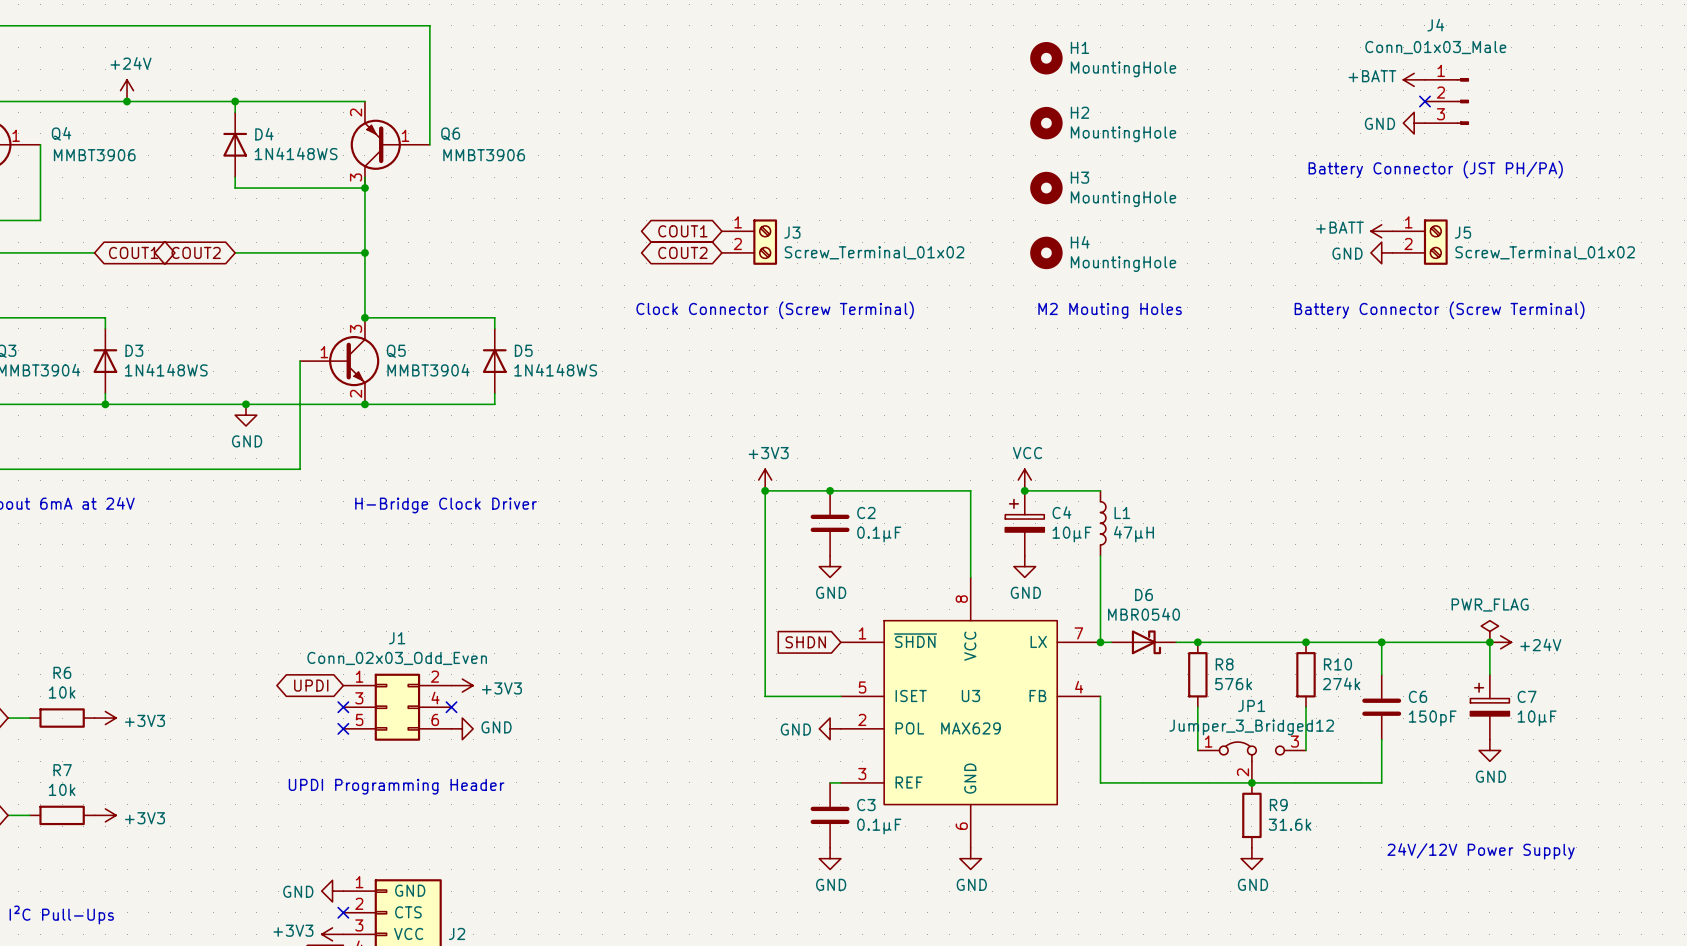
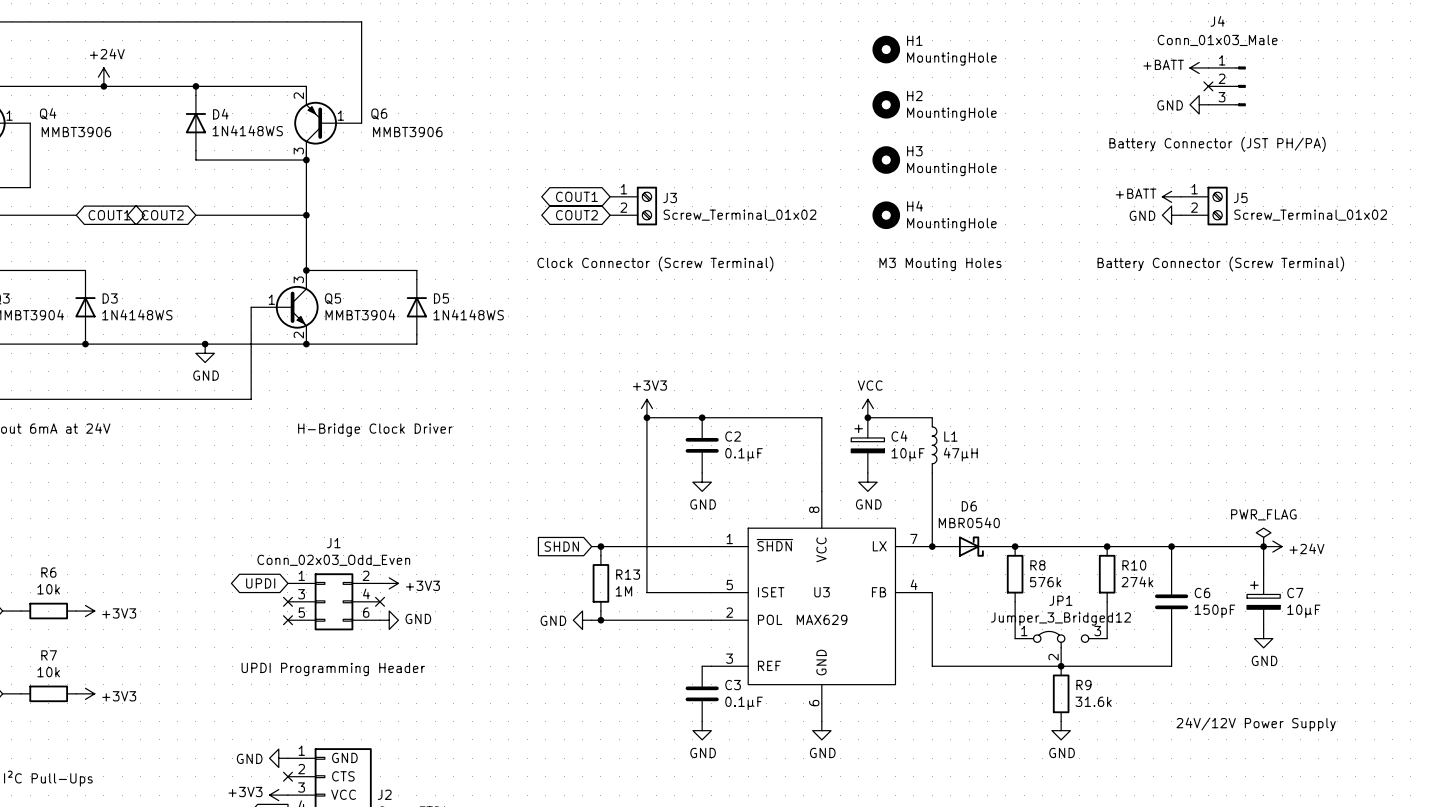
text: M2 Mouting Holes (1110, 310) -> M3 Mouting Holes (940, 264)
wire: none -> (591, 546) (711, 546)
wire: none -> (600, 546) (600, 555)
junction: none -> (600, 546)
global label position: SHDN (805, 642) -> SHDN (561, 546)
R13: none -> 1M (600, 583)
wire: none -> (600, 611) (600, 620)
wire: none -> (591, 620) (711, 620)
junction: none -> (600, 620)
power symbol position: GND (830, 728) -> GND (582, 620)

